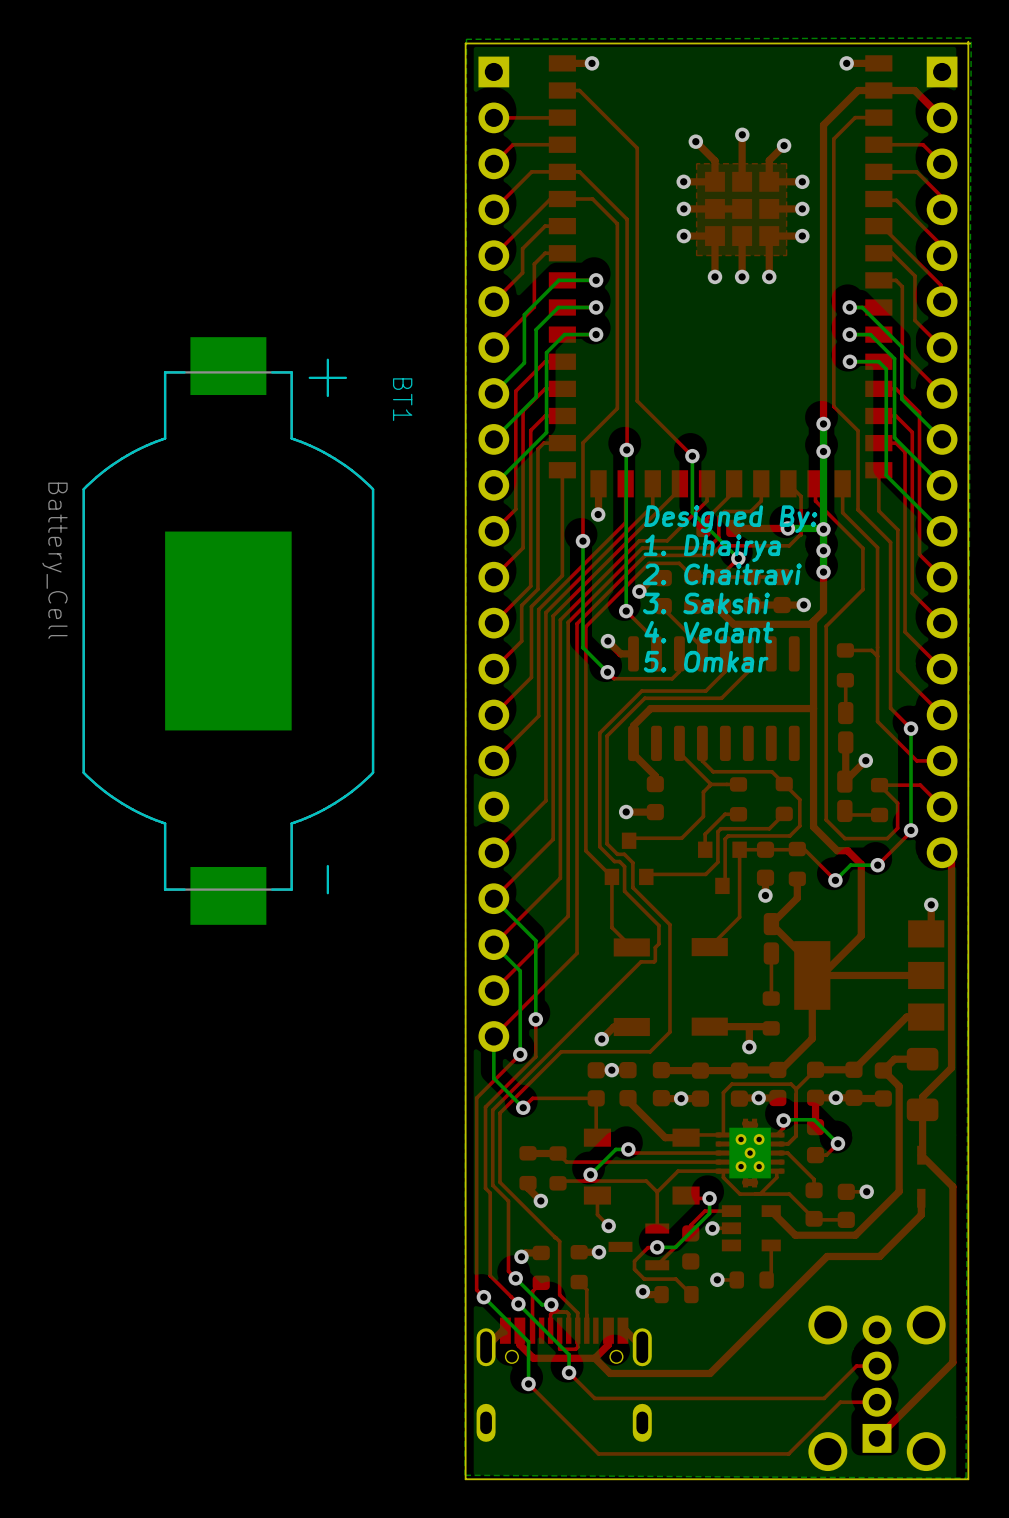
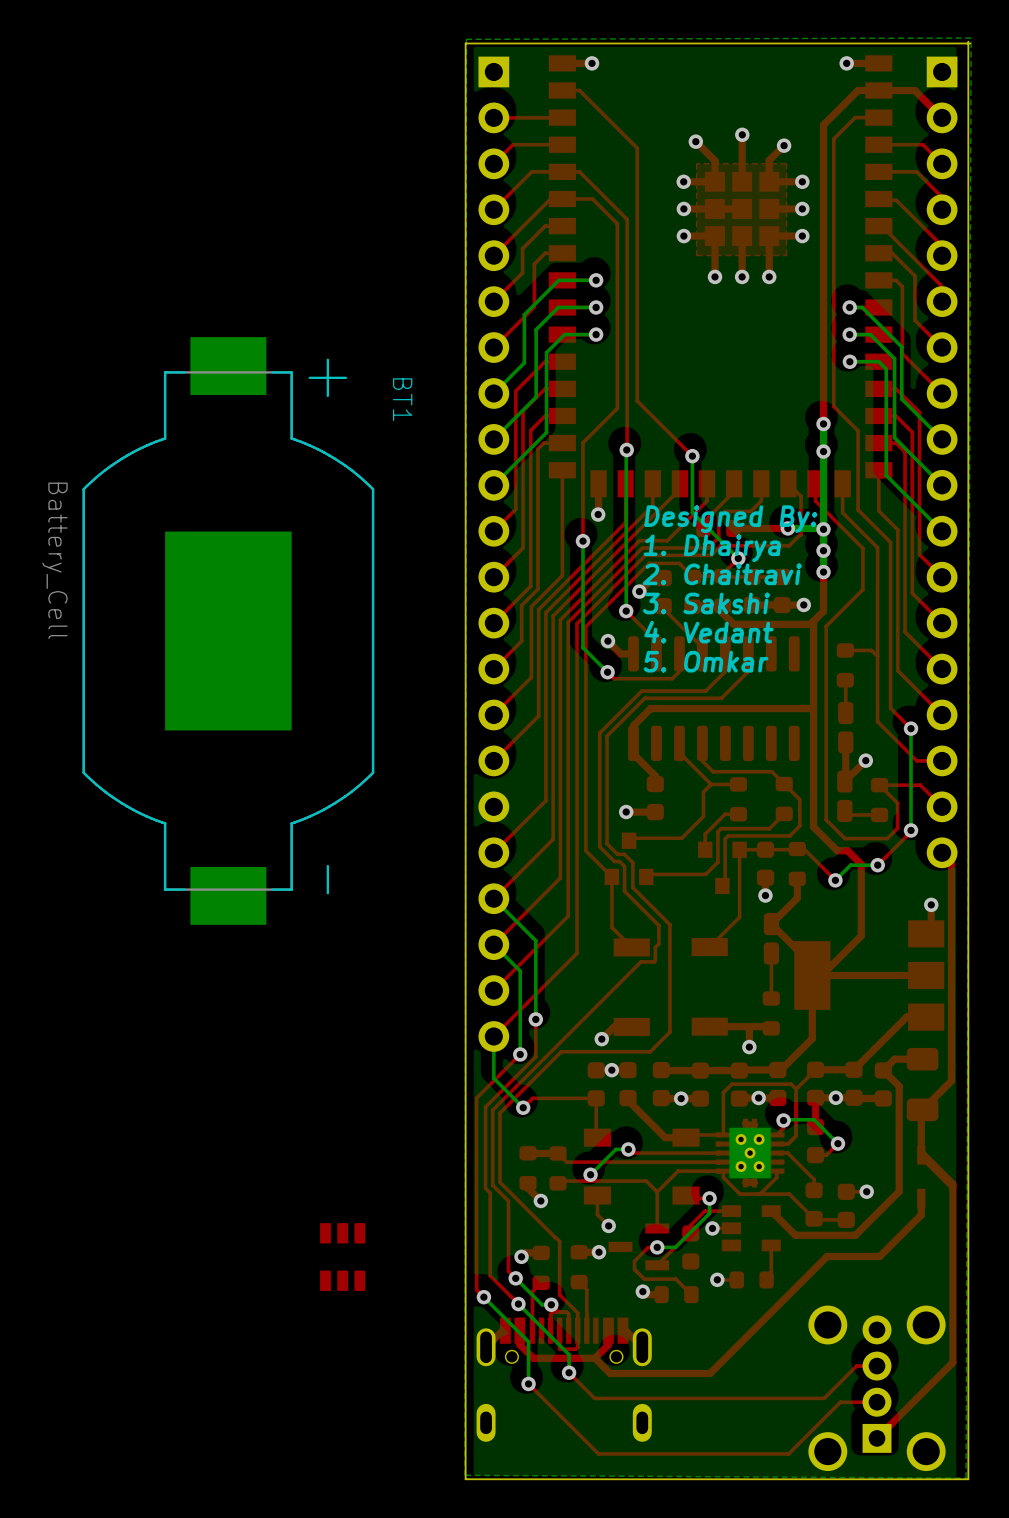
top track: (951, 1067) (922, 1096) (922, 1153) -> (951, 1067) (951, 1080) (921, 1111) (921, 1152) (952, 1184) (952, 1186)
part: none -> (342, 1257)

